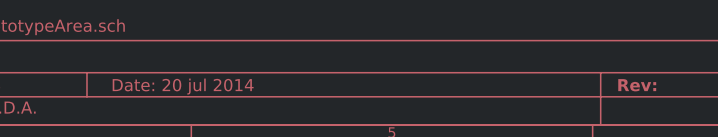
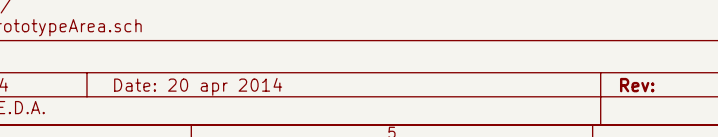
title block: Date: 20 jul 2014 (183, 86) -> Date: 20 apr 2014 (198, 86)

